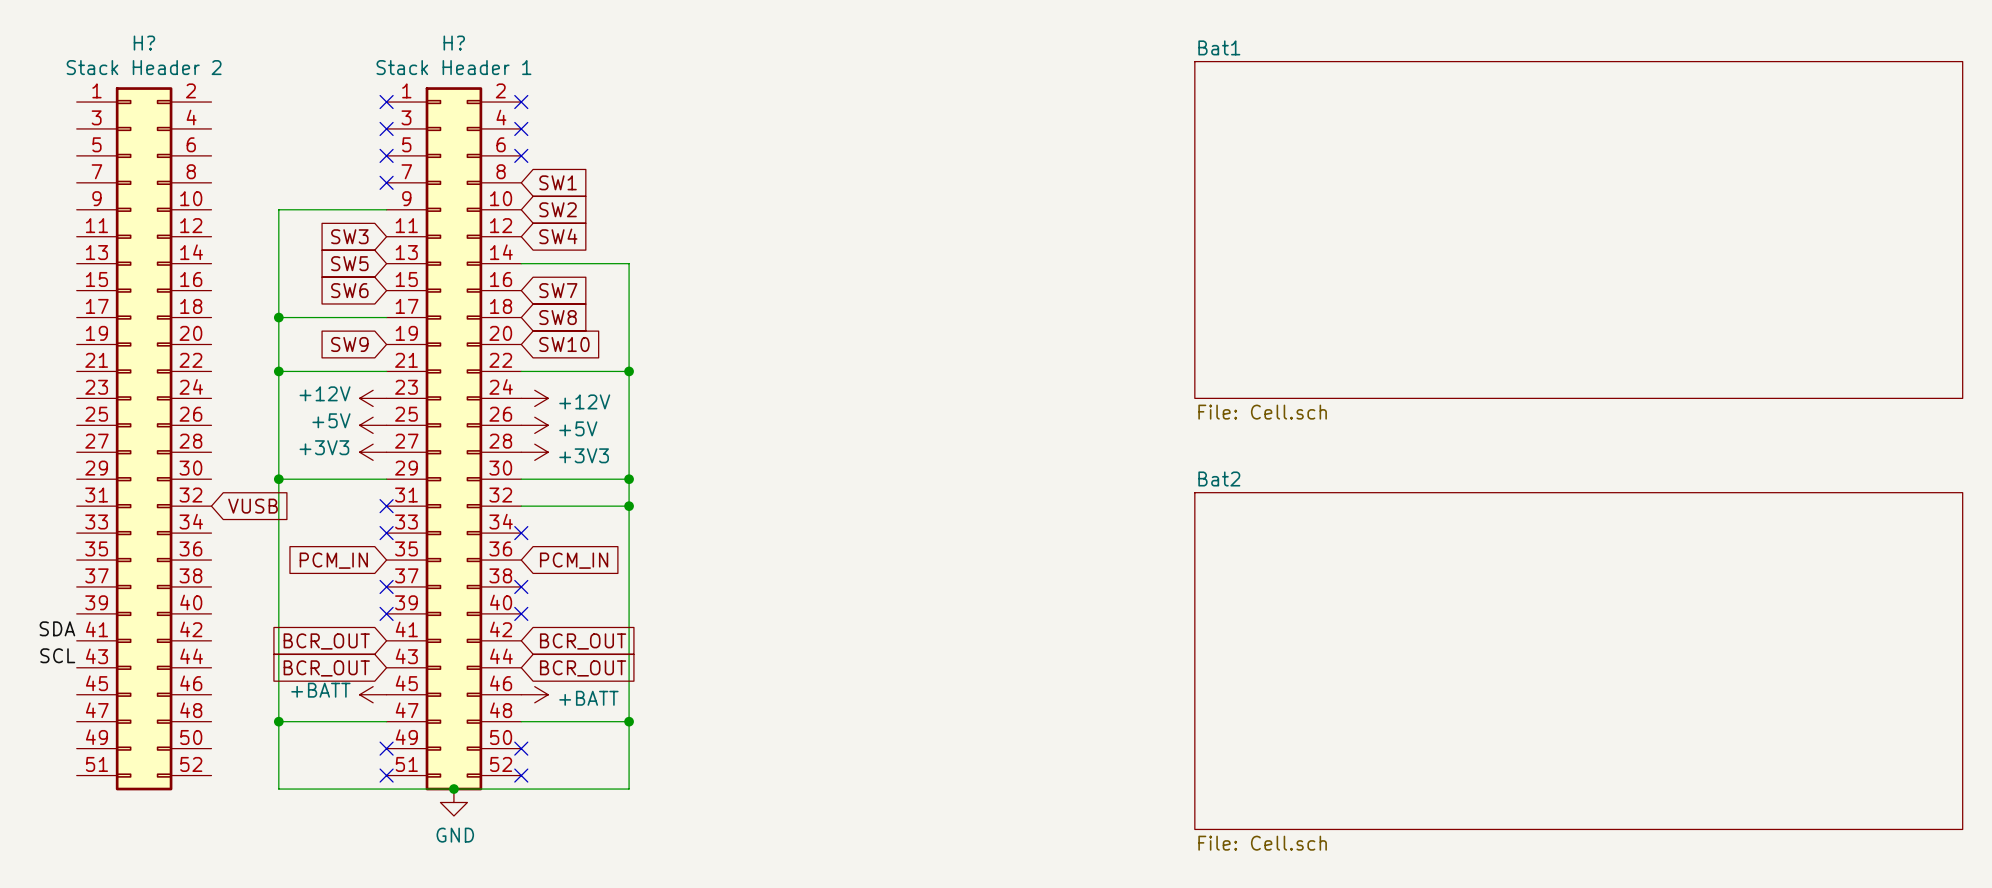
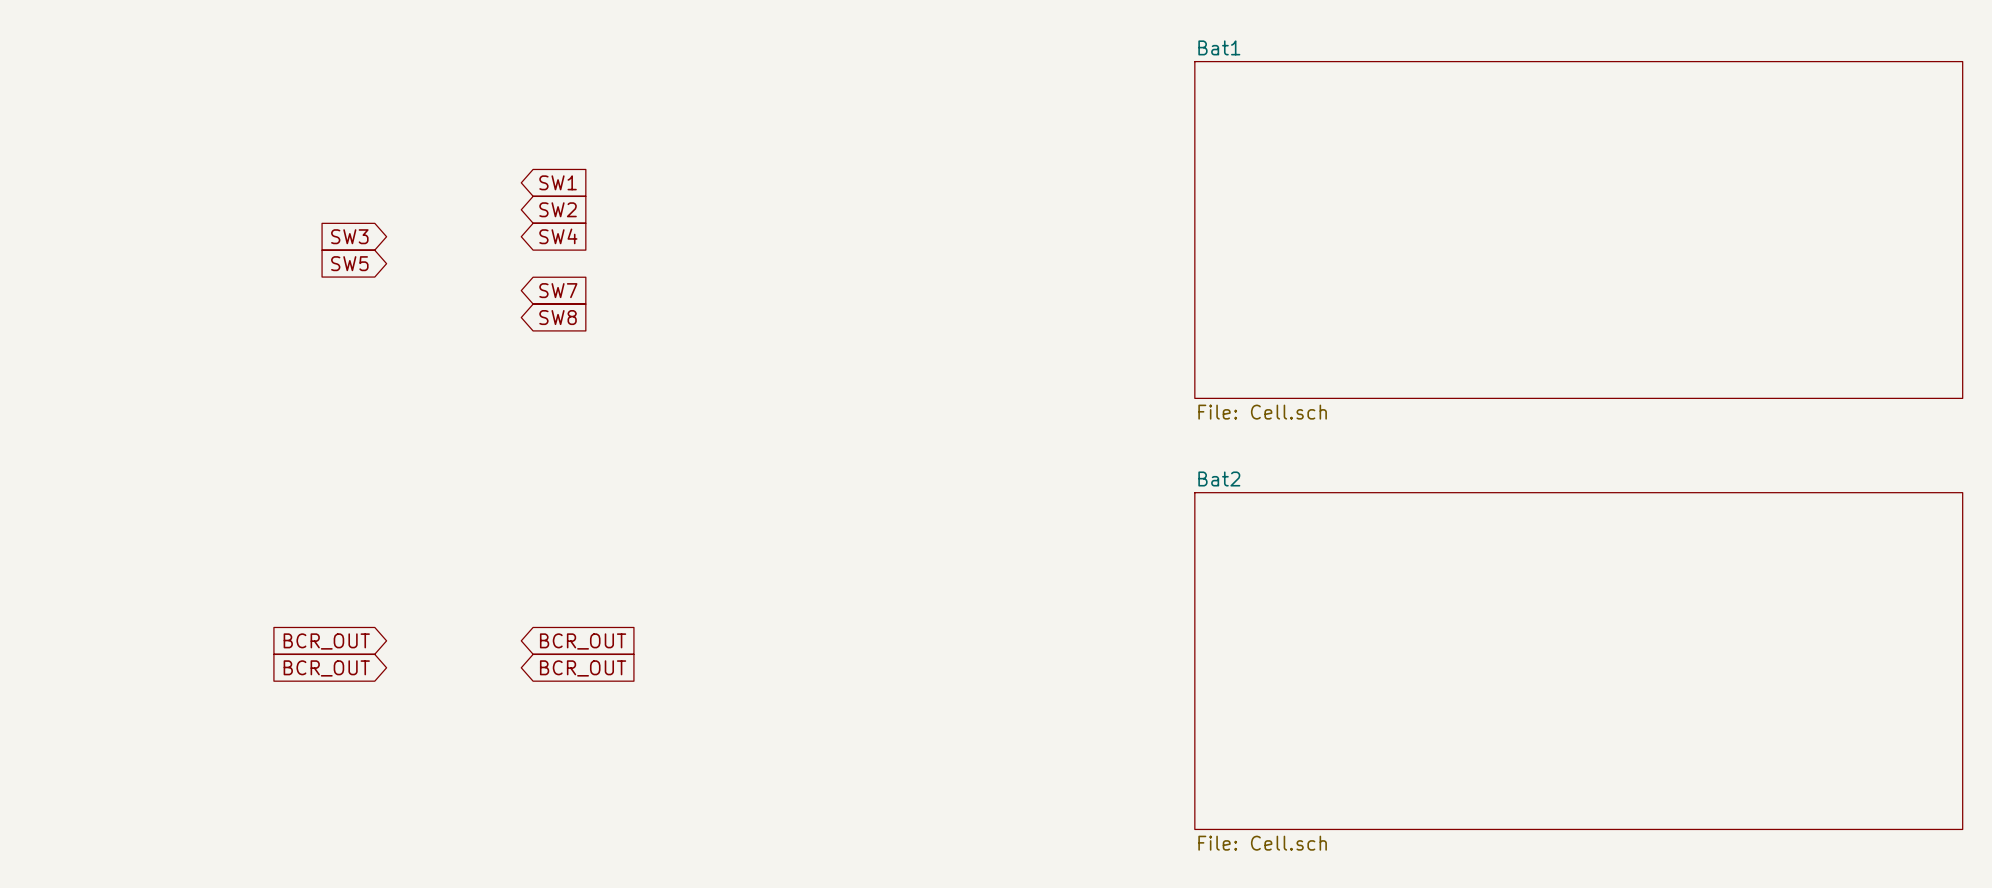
no-connect mark: (386, 102) -> none
no-connect mark: (521, 102) -> none
no-connect mark: (386, 128) -> none
no-connect mark: (521, 128) -> none
no-connect mark: (386, 155) -> none
no-connect mark: (521, 155) -> none
no-connect mark: (386, 182) -> none
wire: (386, 209) (278, 209) (278, 789) (629, 789) (629, 263) (521, 263) -> none
global label: SW6 (349, 290) -> none
wire: (278, 317) (386, 317) -> none
junction: (278, 317) -> none
global label: SW9 (349, 344) -> none
global label: SW10 (564, 344) -> none
wire: (278, 371) (386, 371) -> none
junction: (278, 371) -> none
wire: (521, 371) (629, 371) -> none
junction: (629, 371) -> none
power symbol: +12V (373, 398) -> none
power symbol: +12V (534, 398) -> none
power symbol: +5V (373, 425) -> none
power symbol: +5V (534, 425) -> none
H?: Stack Header 2 (144, 438) -> none
H?: Stack Header 1 (453, 438) -> none
power symbol: +3V3 (373, 452) -> none
power symbol: +3V3 (534, 452) -> none
wire: (278, 479) (386, 479) -> none
junction: (278, 479) -> none
wire: (521, 479) (629, 479) -> none
junction: (629, 479) -> none
global label: VUSB (253, 506) -> none
no-connect mark: (386, 506) -> none
wire: (521, 506) (629, 506) -> none
junction: (629, 506) -> none
no-connect mark: (386, 533) -> none
no-connect mark: (521, 533) -> none
global label: PCM_IN (333, 560) -> none
global label: PCM_IN (574, 560) -> none
no-connect mark: (386, 586) -> none
no-connect mark: (521, 586) -> none
no-connect mark: (386, 613) -> none
no-connect mark: (521, 613) -> none
label: SDA (57, 628) -> none
label: SCL (57, 655) -> none
power symbol: +BATT (373, 694) -> none
power symbol: +BATT (534, 694) -> none
wire: (278, 721) (386, 721) -> none
junction: (278, 721) -> none
wire: (521, 721) (629, 721) -> none
junction: (629, 721) -> none
no-connect mark: (386, 748) -> none
no-connect mark: (521, 748) -> none
no-connect mark: (386, 775) -> none
no-connect mark: (521, 775) -> none
junction: (453, 789) -> none
power symbol: GND (453, 802) -> none

